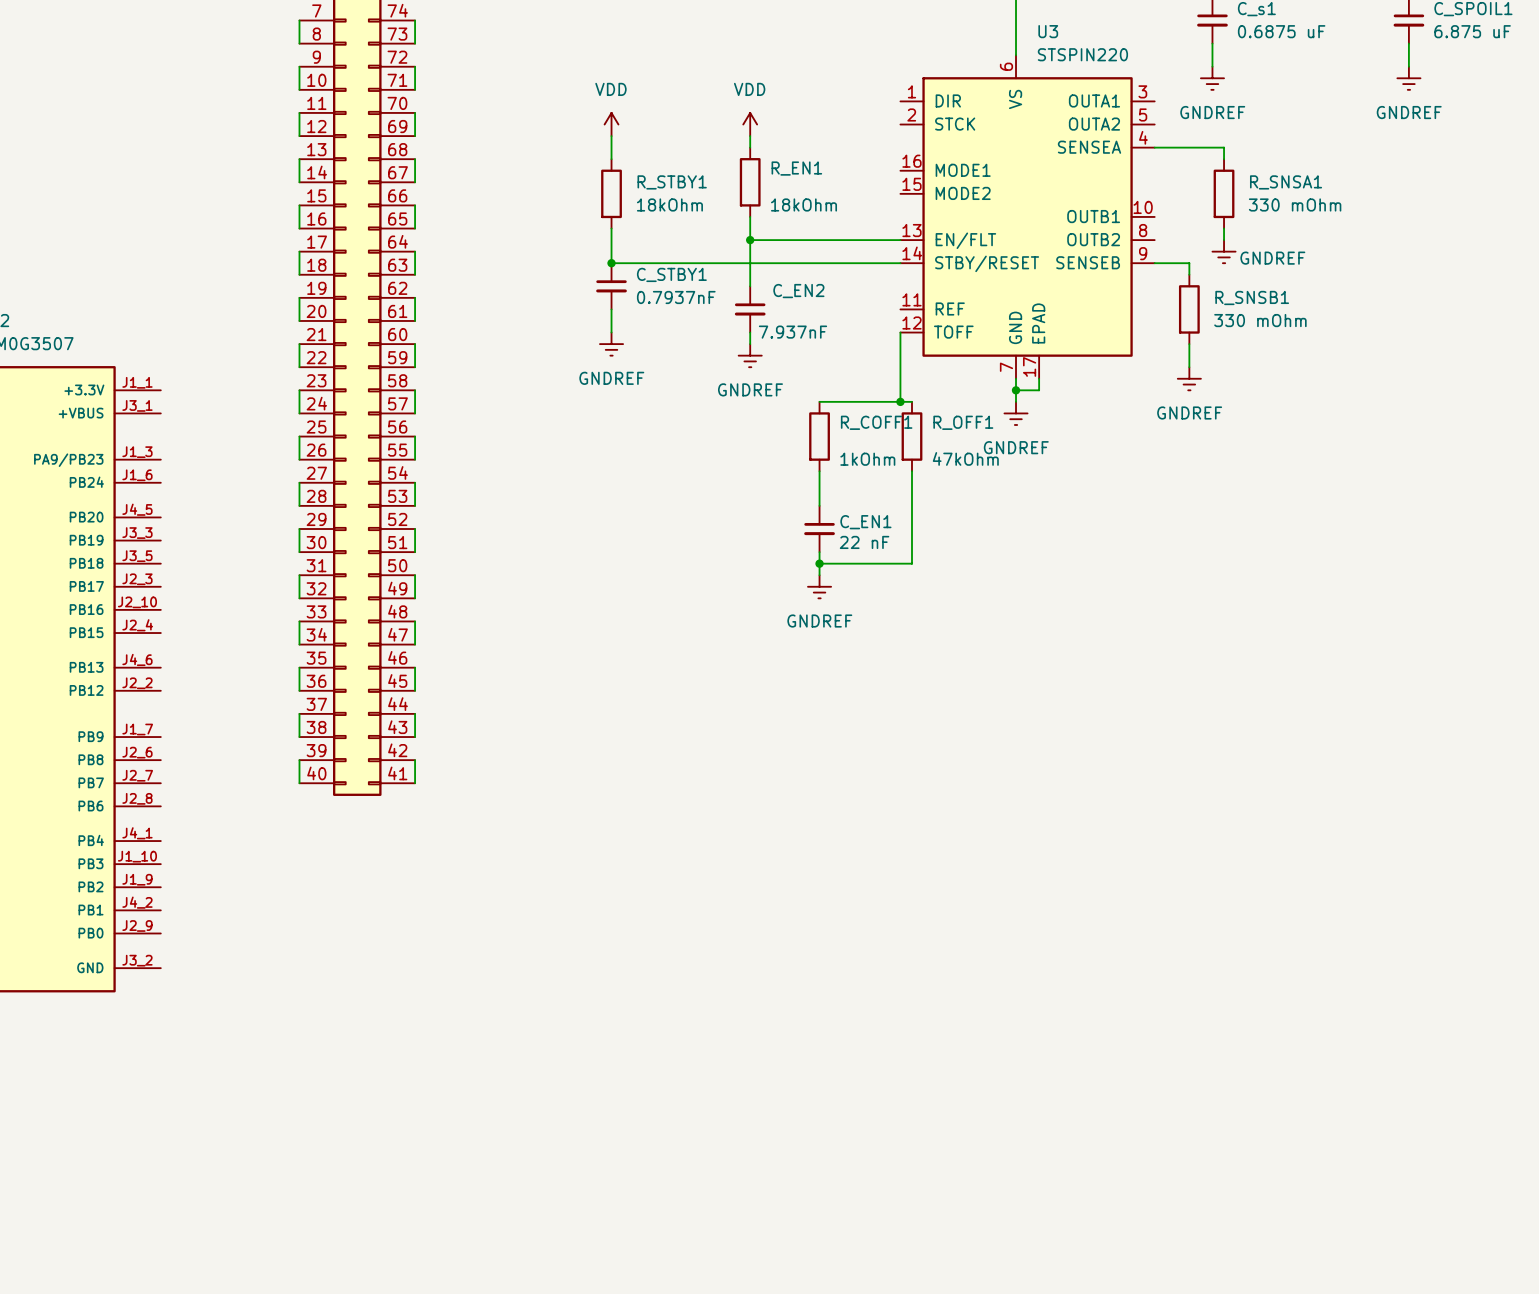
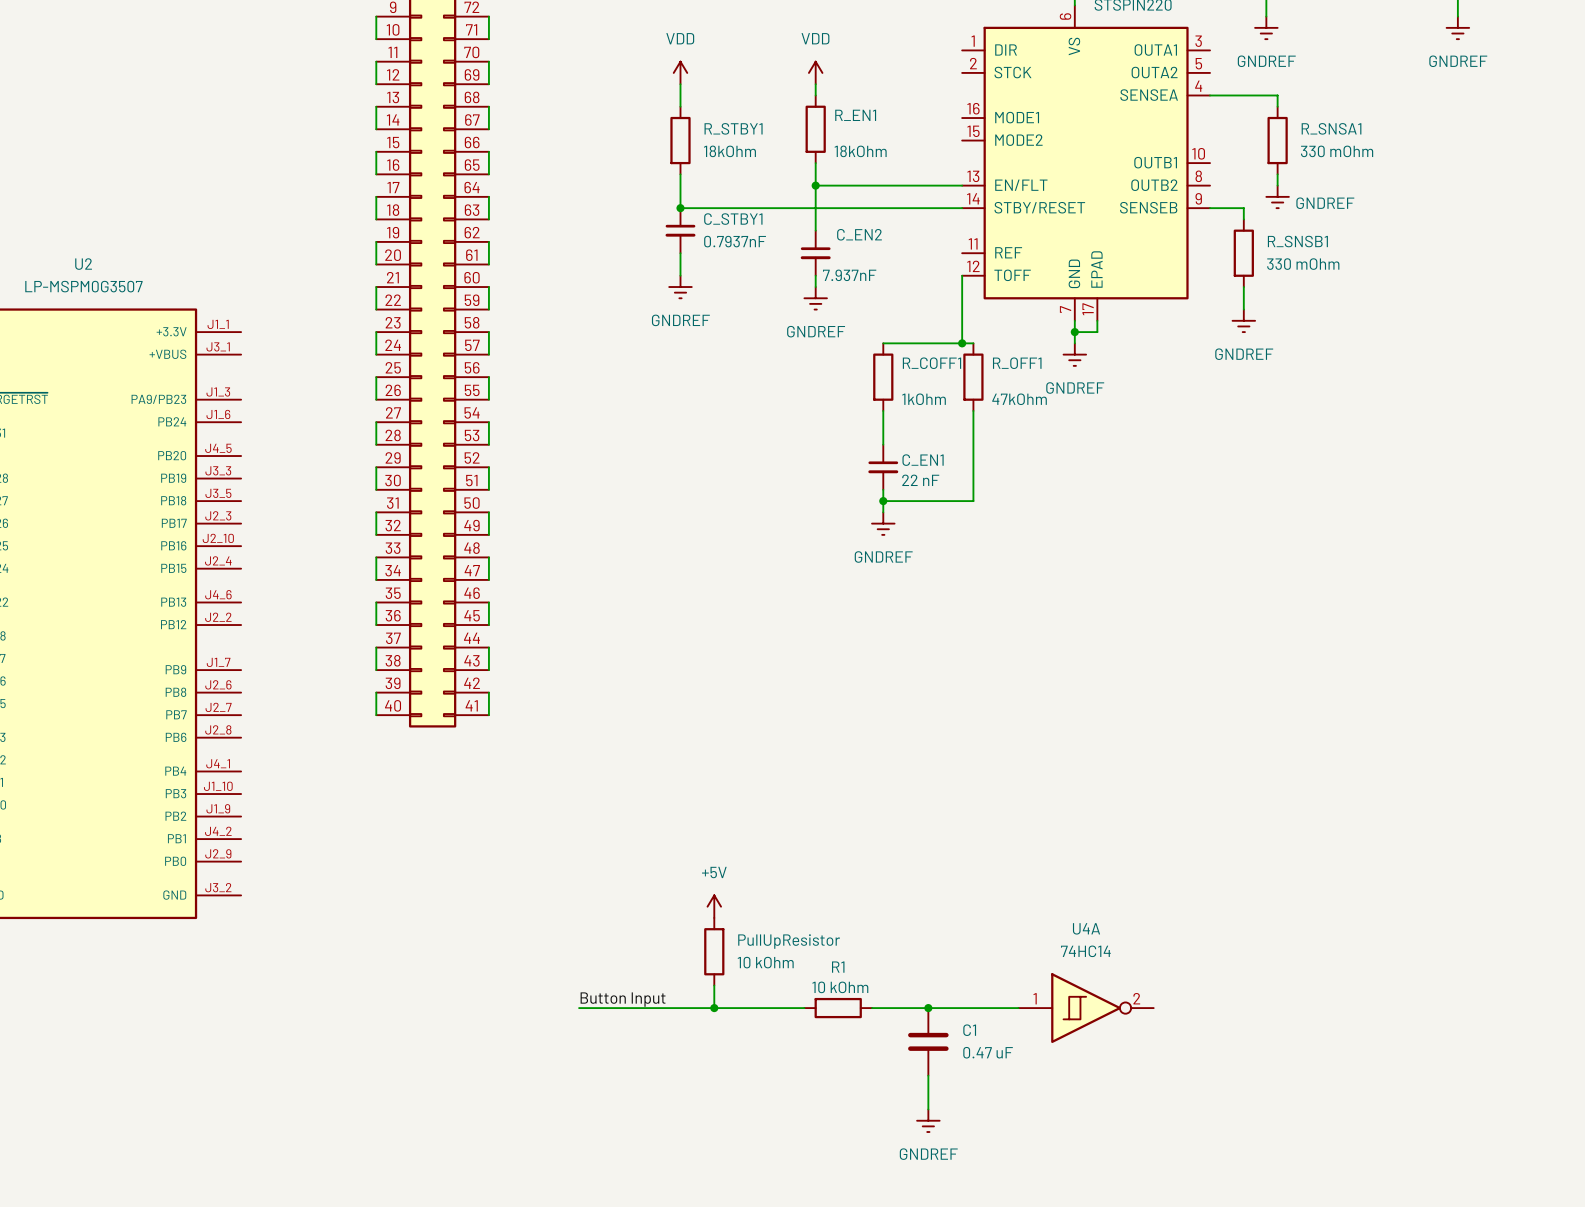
power symbol: none -> +5V (714, 906)
PullUpResistor: none -> 10 kOhm (714, 951)
wire: none -> (714, 985) (714, 1008)
label: none -> Button Input (623, 999)
wire: none -> (579, 1008) (804, 1008)
junction: none -> (714, 1008)
R1: none -> 10 kOhm (838, 1008)
wire: none -> (872, 1008) (1018, 1008)
junction: none -> (928, 1008)
U4A: none -> 74HC14 (1086, 1008)
C1: none -> 0.47 uF (928, 1041)
wire: none -> (928, 1075) (928, 1109)
power symbol: none -> GNDREF (928, 1120)

